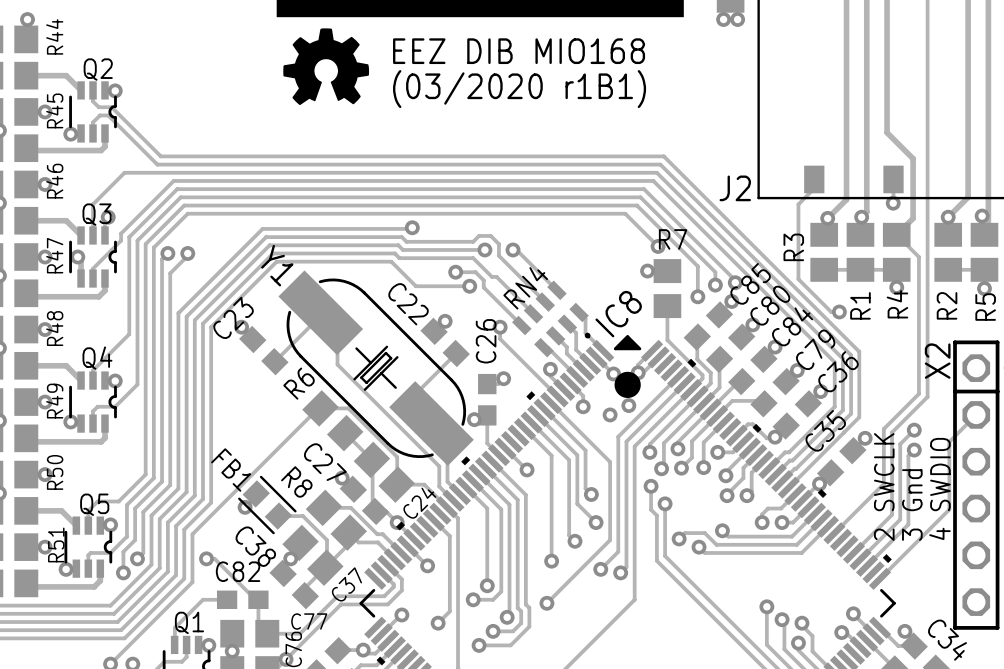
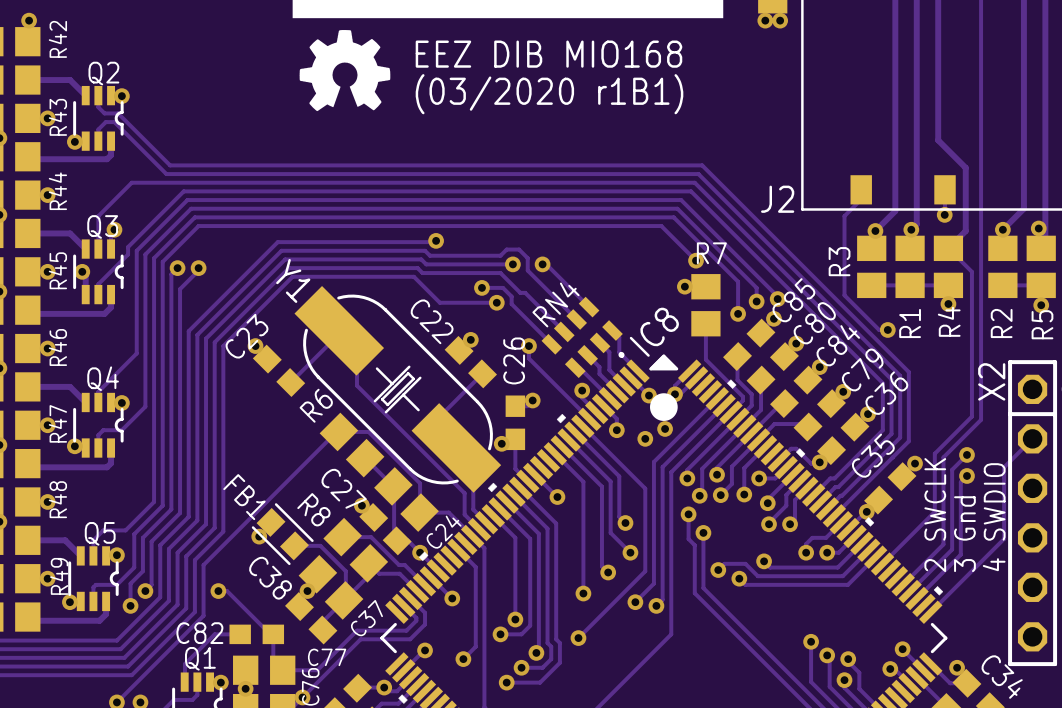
R44 name: R44 (54, 36) -> R42 (57, 39)
R45 name: R45 (54, 110) -> R43 (57, 117)
R46 name: R46 (54, 181) -> R44 (57, 191)
R47 name: R47 (54, 255) -> R45 (57, 270)
R48 name: R48 (54, 328) -> R46 (57, 347)
R49 name: R49 (54, 401) -> R47 (57, 423)
R50 name: R50 (55, 472) -> R48 (57, 499)
R51 name: R51 (56, 544) -> R49 (59, 576)
C82 name position: C82 (238, 571) -> C82 (199, 633)

